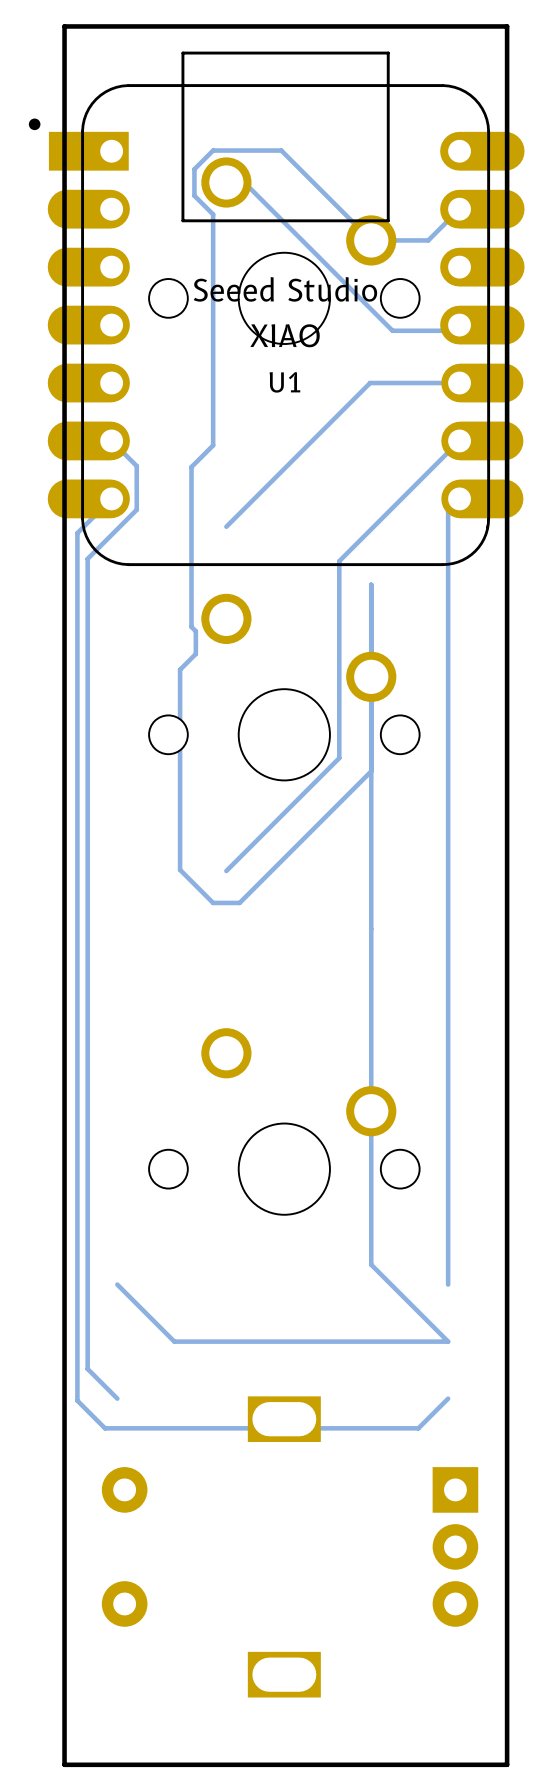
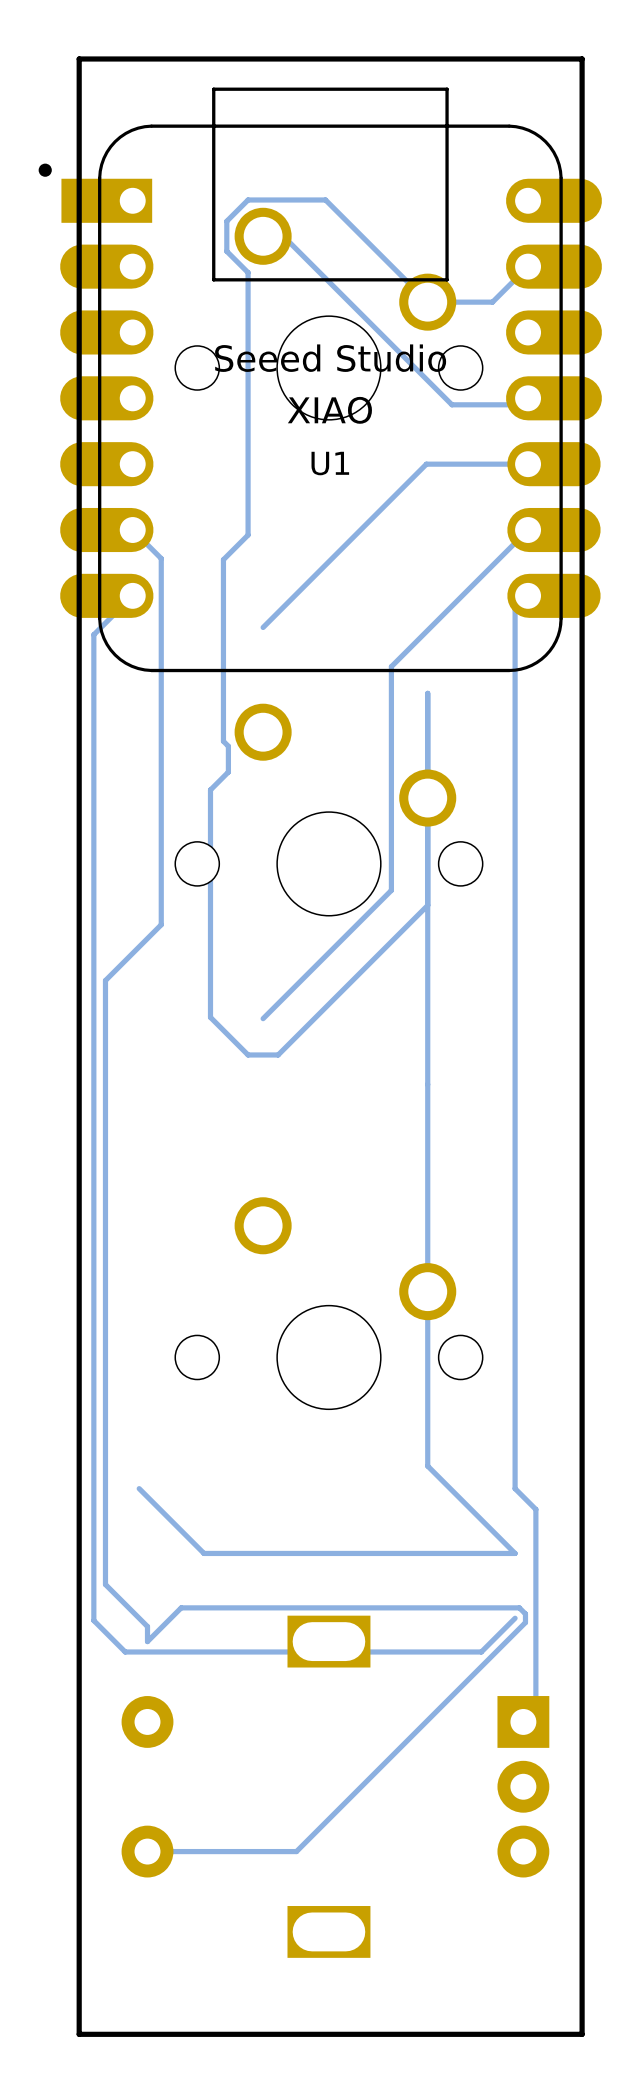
track: (136, 509) (87, 558) (87, 837) -> (161, 608) (161, 924) (105, 980)
track: none -> (515, 1488) (535, 1509) (535, 1709) (523, 1721)
track: none -> (139, 1618) (147, 1626) (147, 1641) (181, 1607) (519, 1607) (525, 1613) (525, 1622) (296, 1851) (147, 1851)

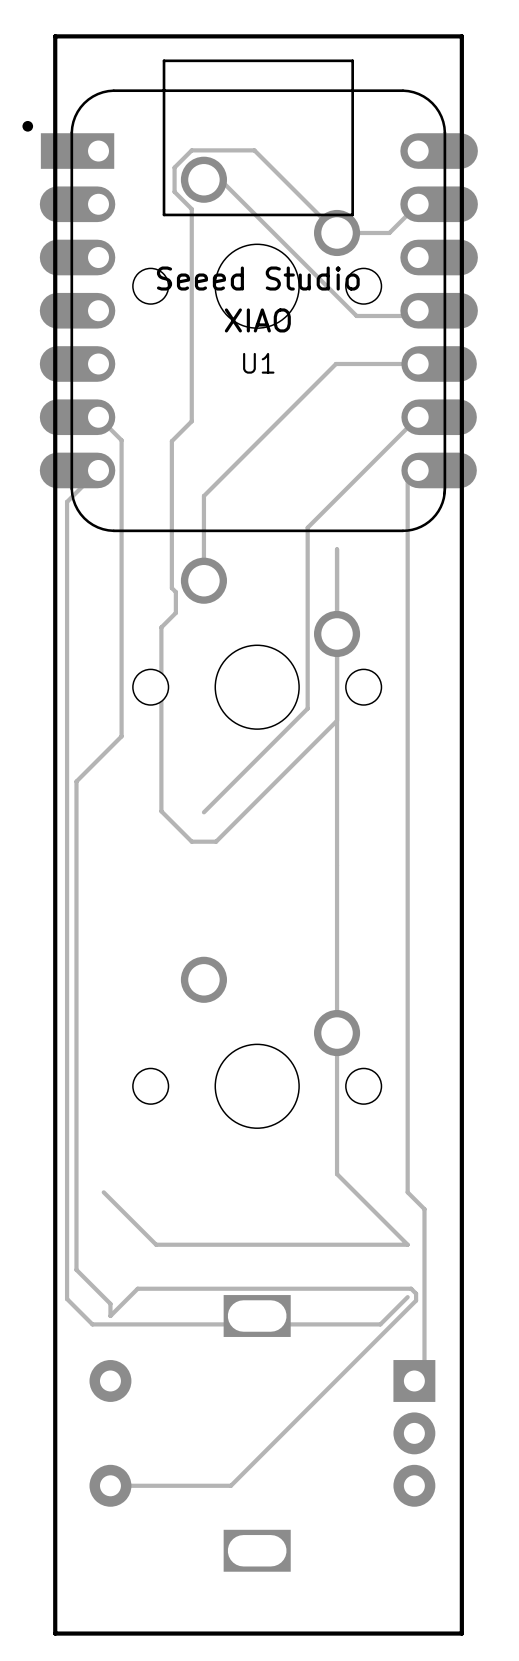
track: none -> (203, 496) (203, 580)

